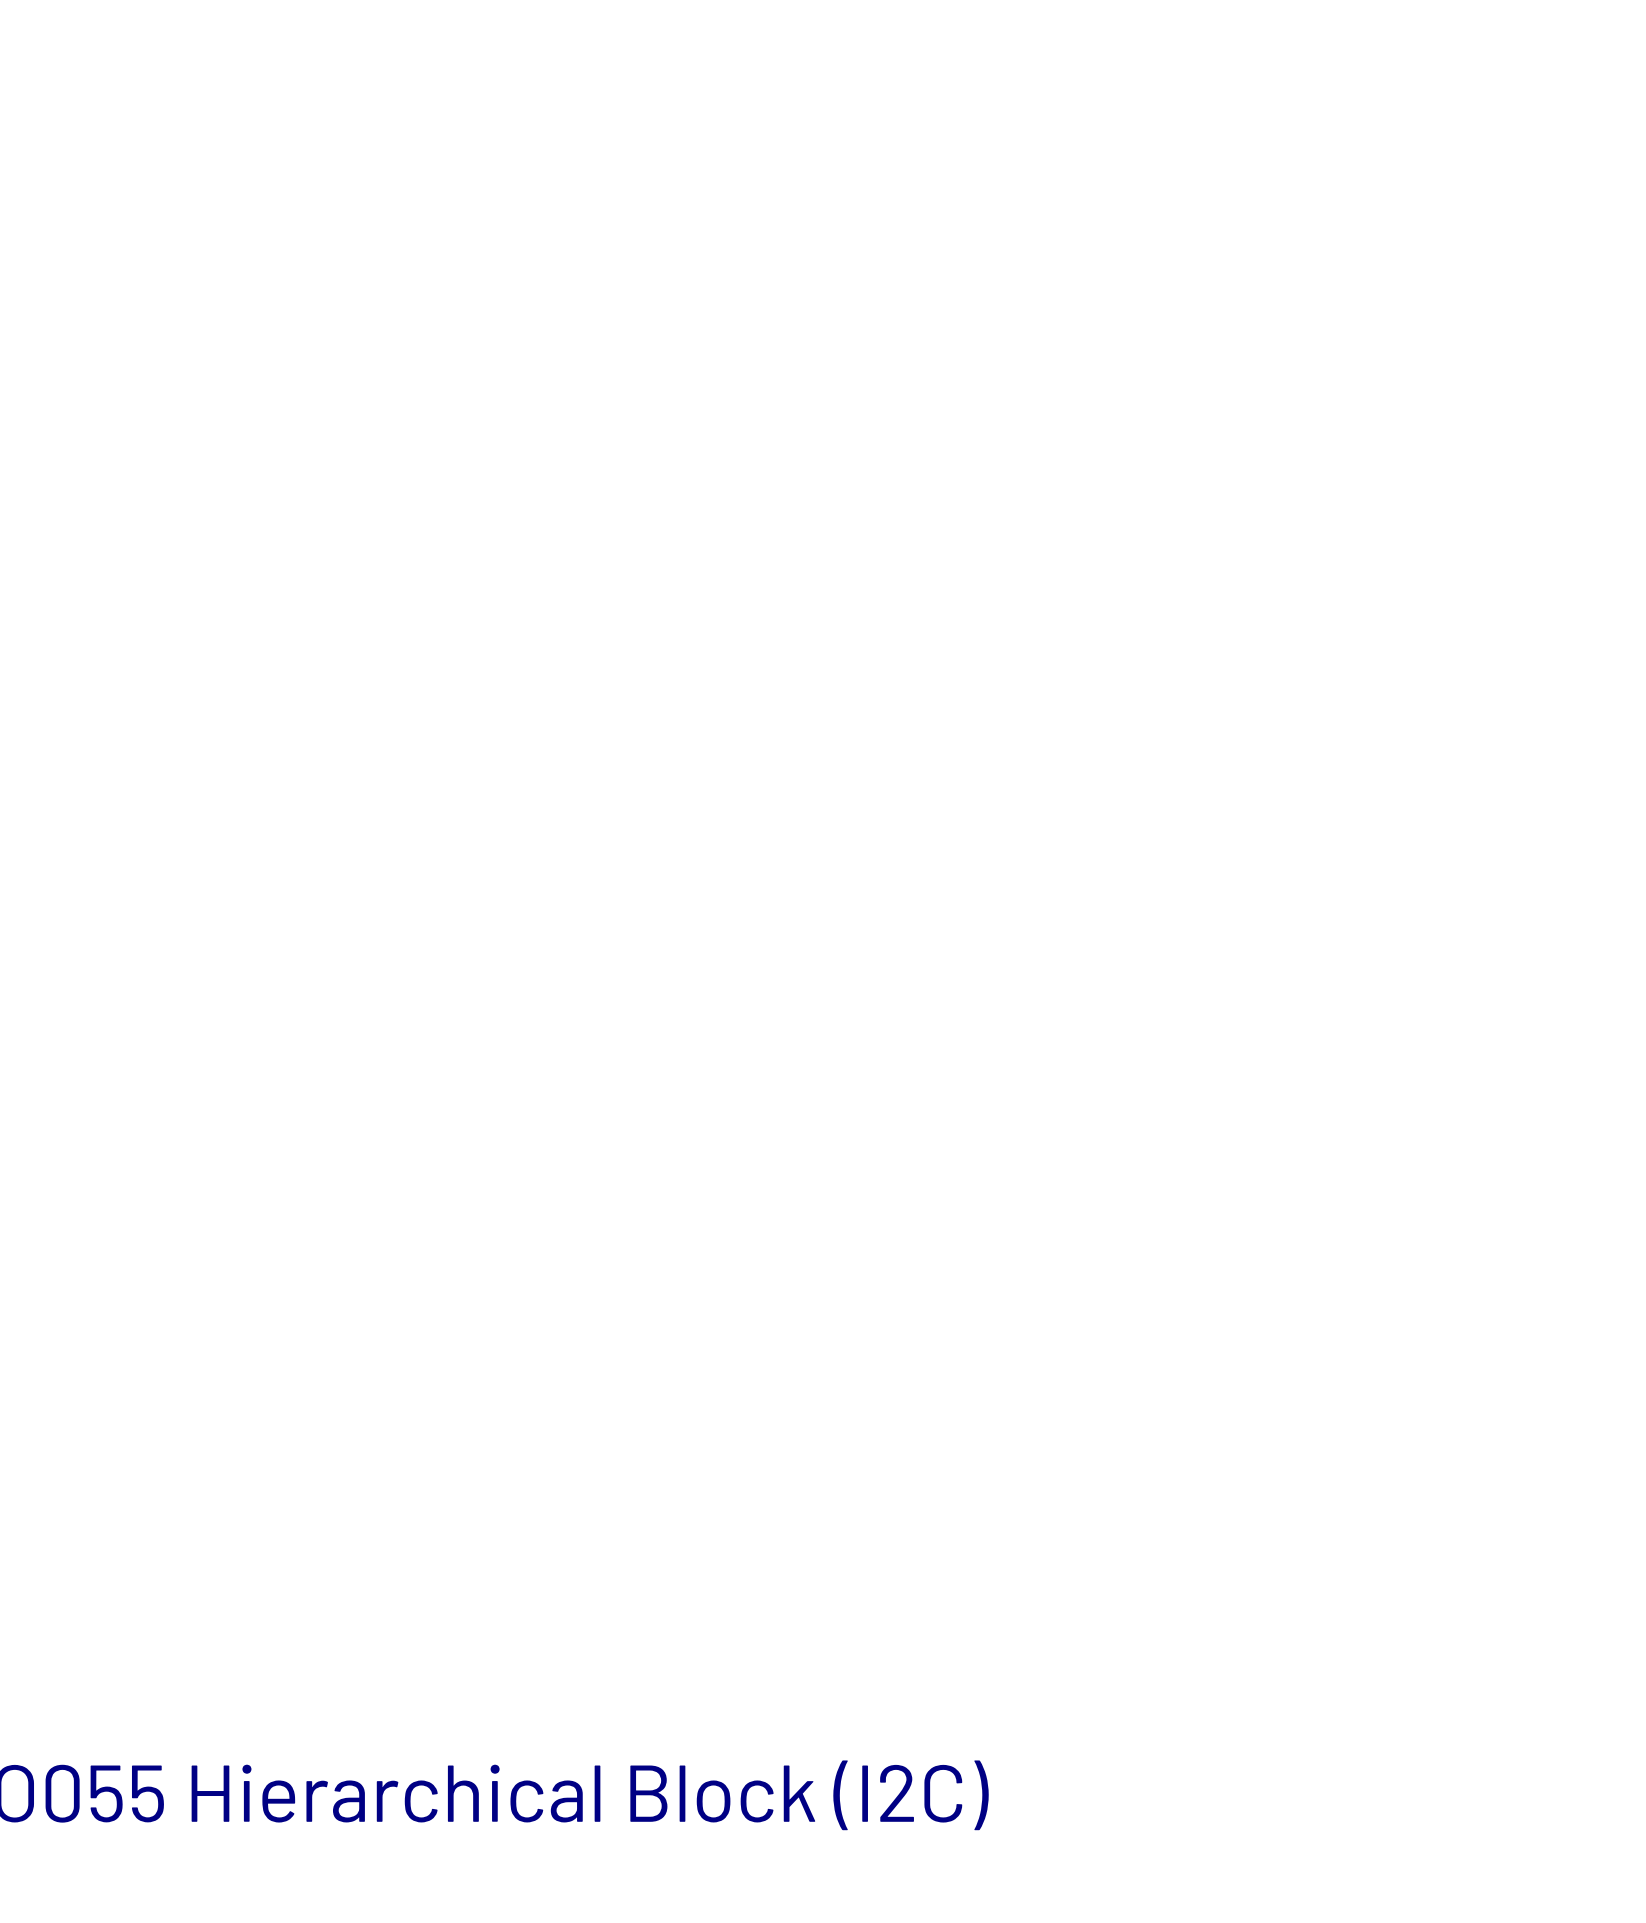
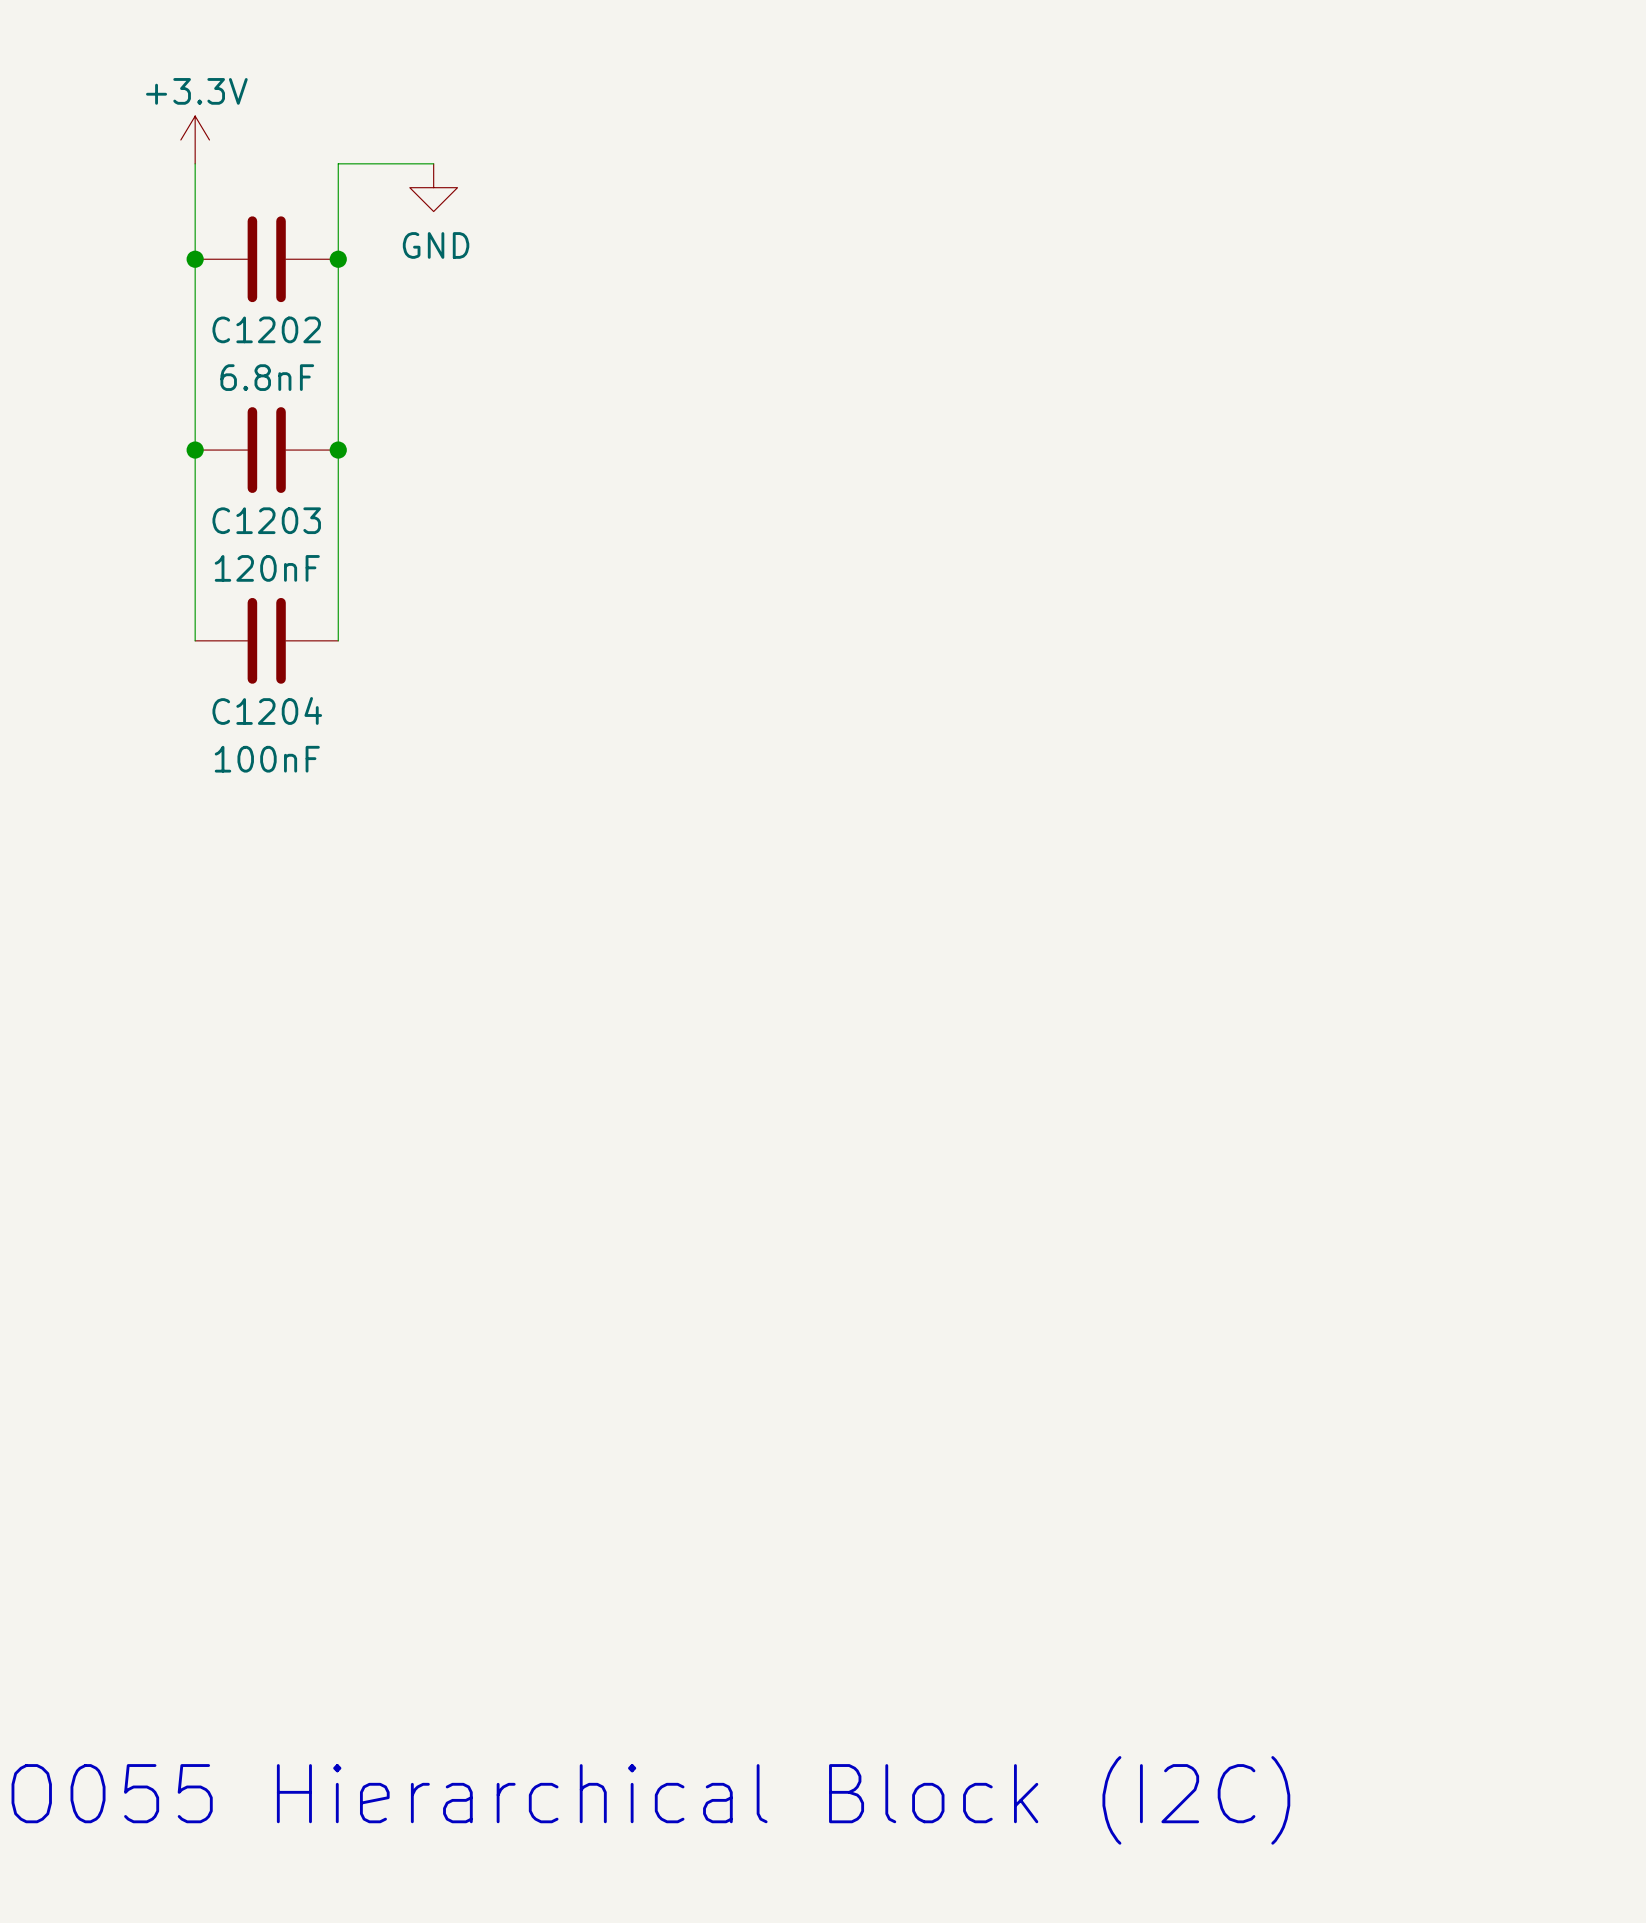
power symbol: none -> +3.3V (195, 139)
wire: none -> (195, 163) (195, 640)
wire: none -> (433, 163) (338, 163) (338, 640)
power symbol: none -> GND (433, 187)
junction: none -> (195, 259)
C1202: none -> 6.8nF (266, 259)
junction: none -> (338, 259)
junction: none -> (195, 450)
C1203: none -> 120nF (266, 450)
junction: none -> (338, 450)
C1204: none -> 100nF (266, 640)

